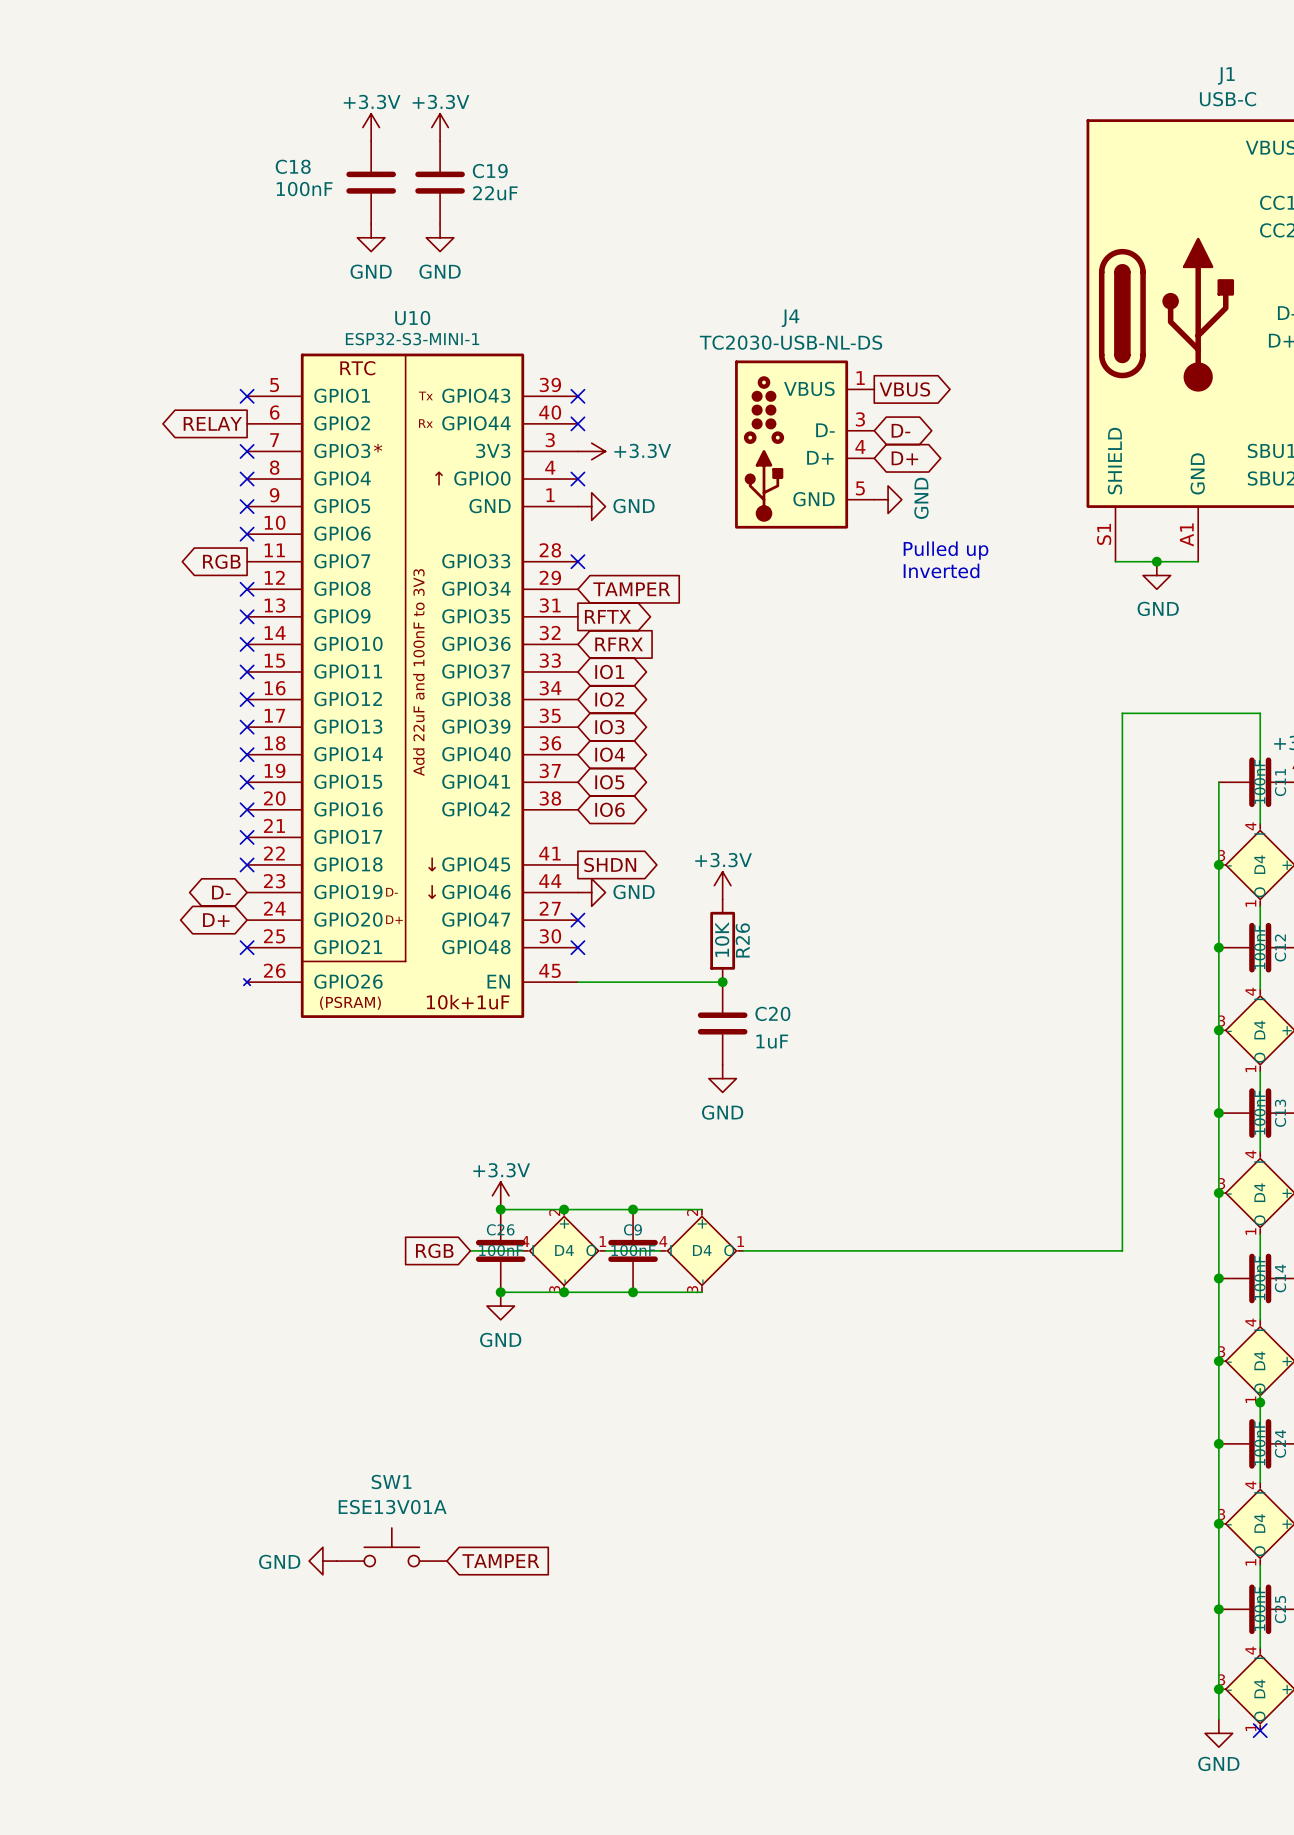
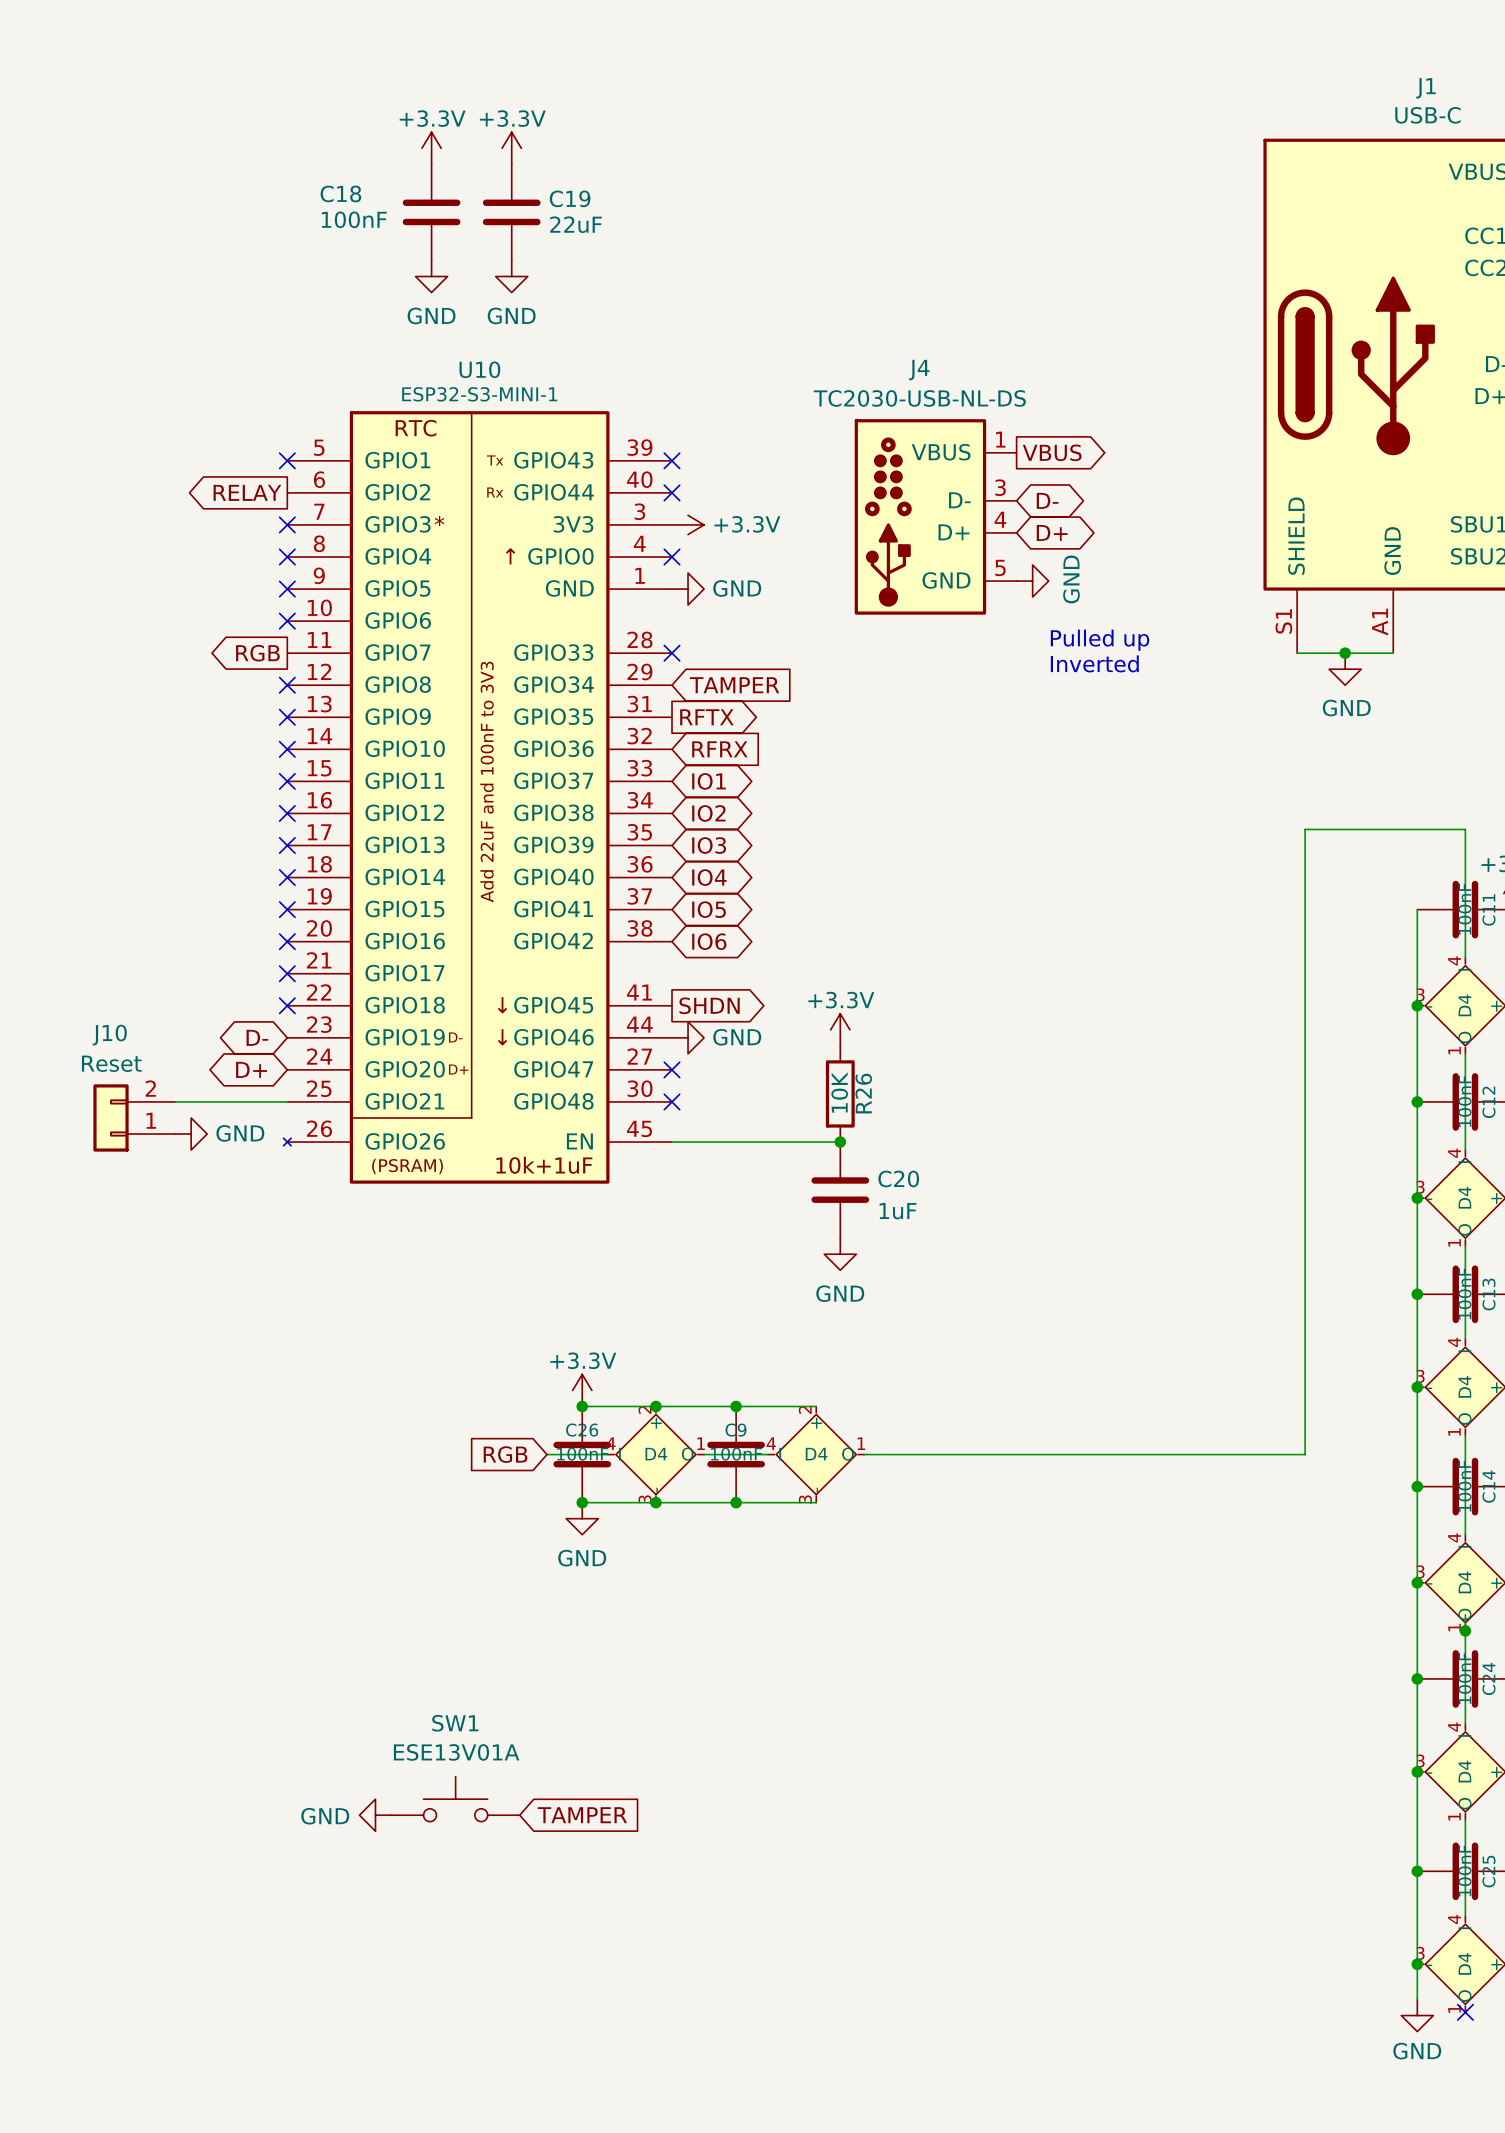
wire: none -> (175, 1101) (287, 1101)
no-connect mark: (247, 947) -> none
J10: none -> Reset (134, 1117)
power symbol: none -> GND (191, 1134)

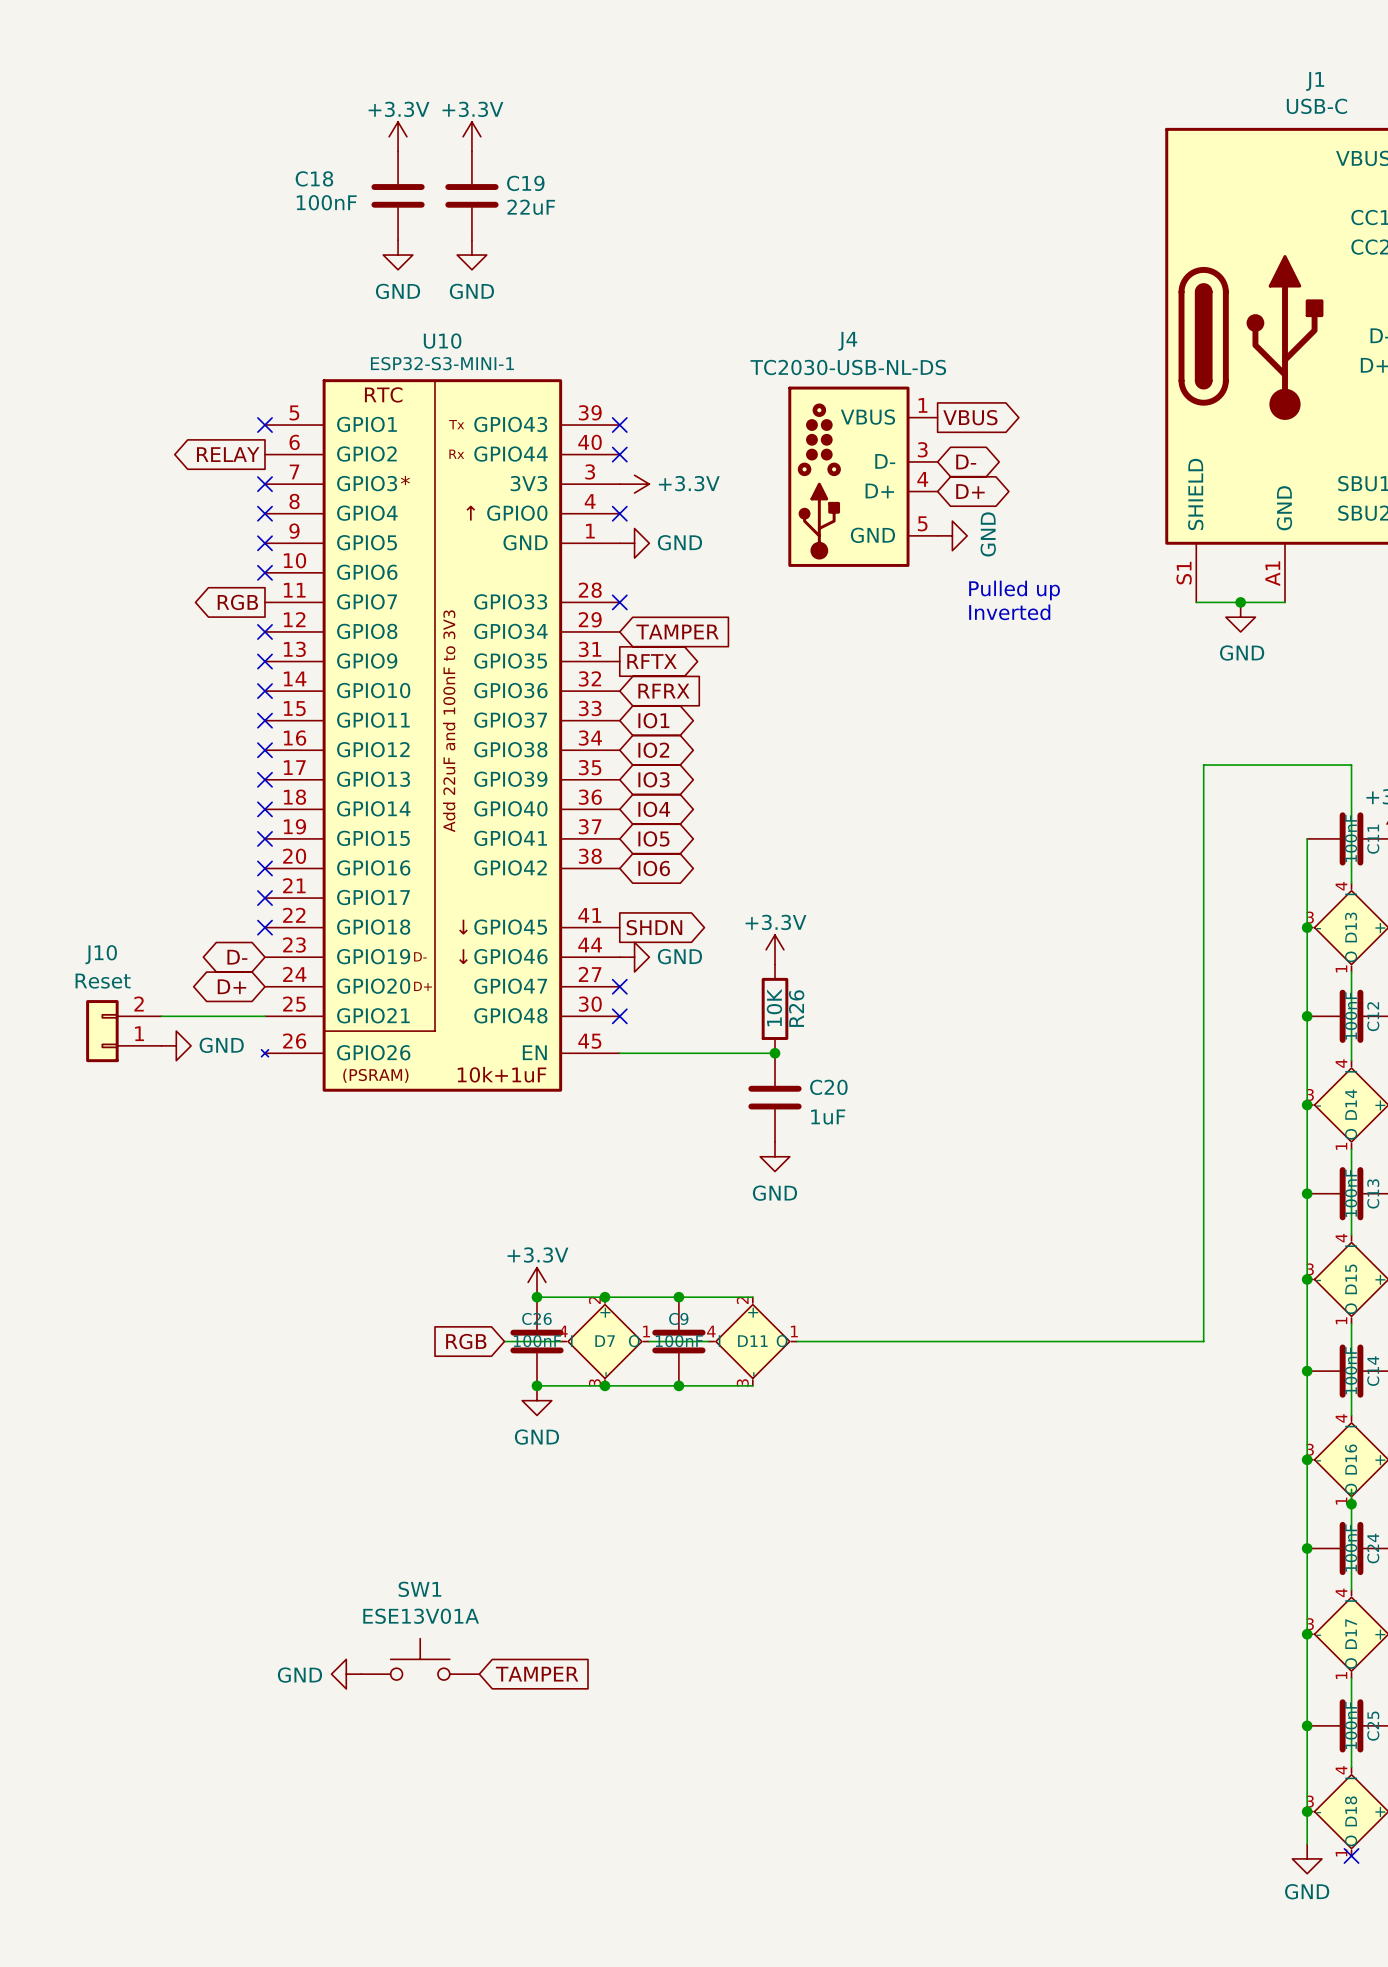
D4 name: D4 (1464, 1005) -> D13 (1351, 927)
D4 name: D4 (1464, 1197) -> D14 (1351, 1104)
D4 name: D4 (1464, 1386) -> D15 (1351, 1279)
D4 name: D4 (656, 1454) -> D7 (605, 1341)
D4 name: D4 (816, 1454) -> D11 (752, 1341)
D4 name: D4 (1464, 1582) -> D16 (1351, 1459)
D4 name: D4 (1464, 1771) -> D17 (1351, 1634)
D4 name: D4 (1464, 1963) -> D18 (1351, 1811)

